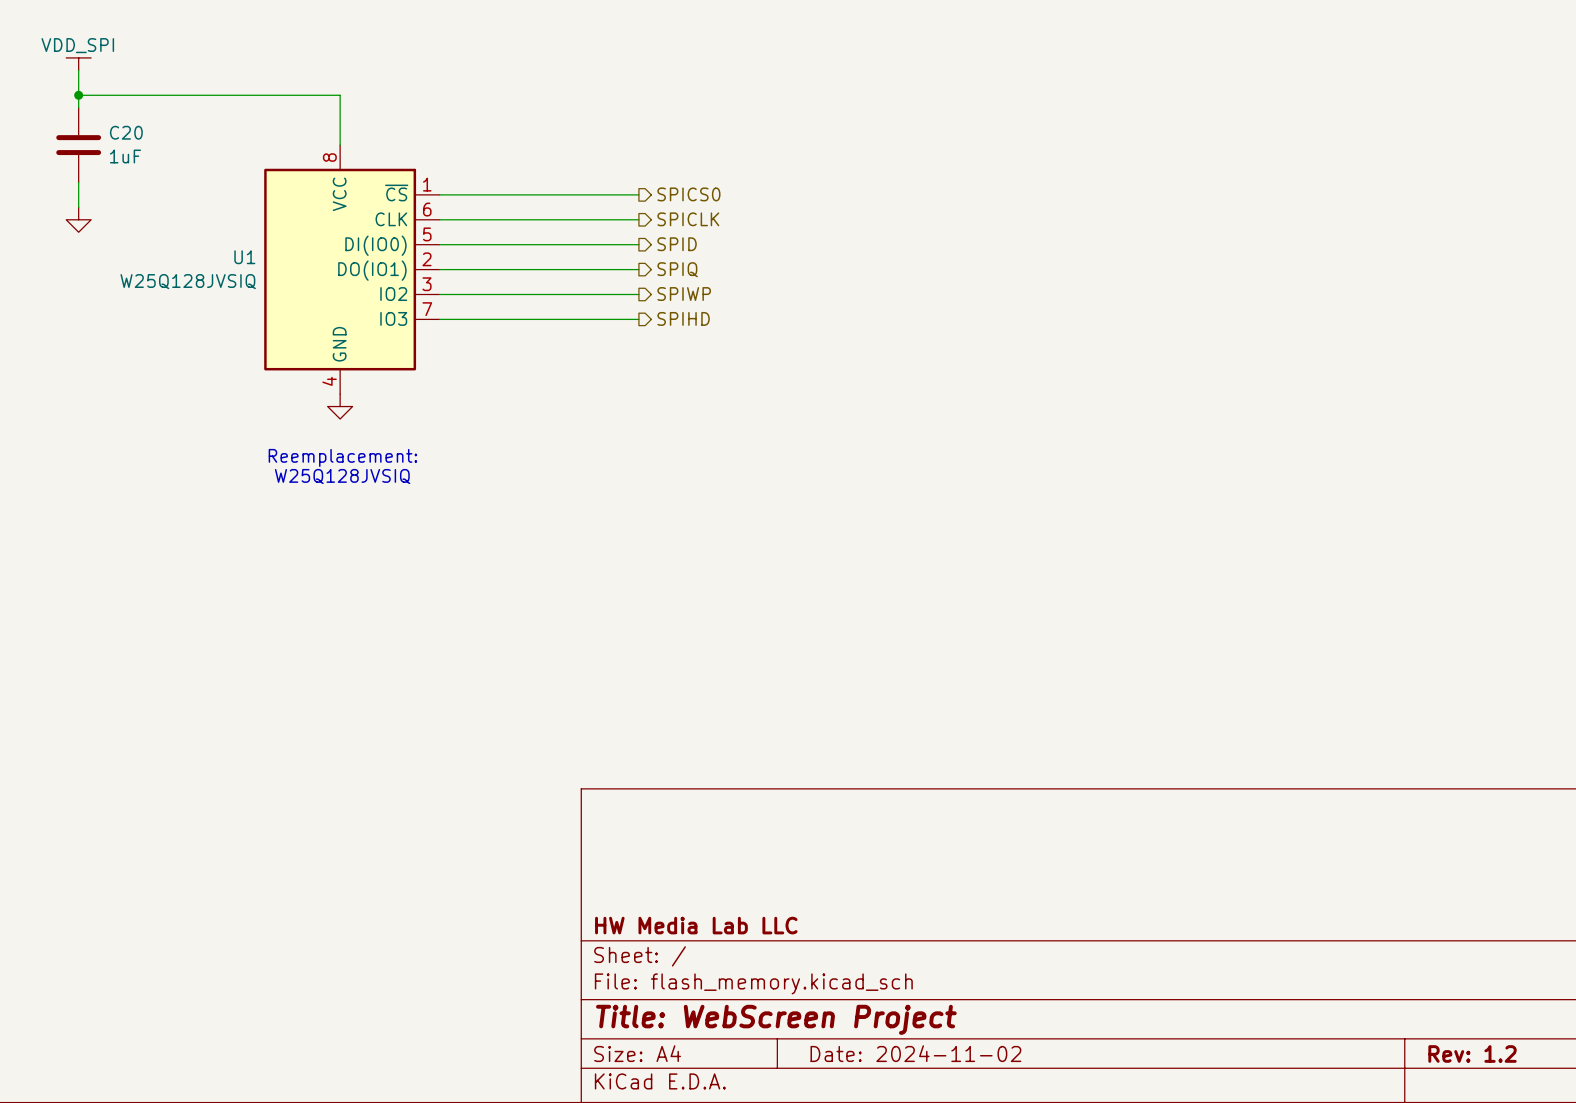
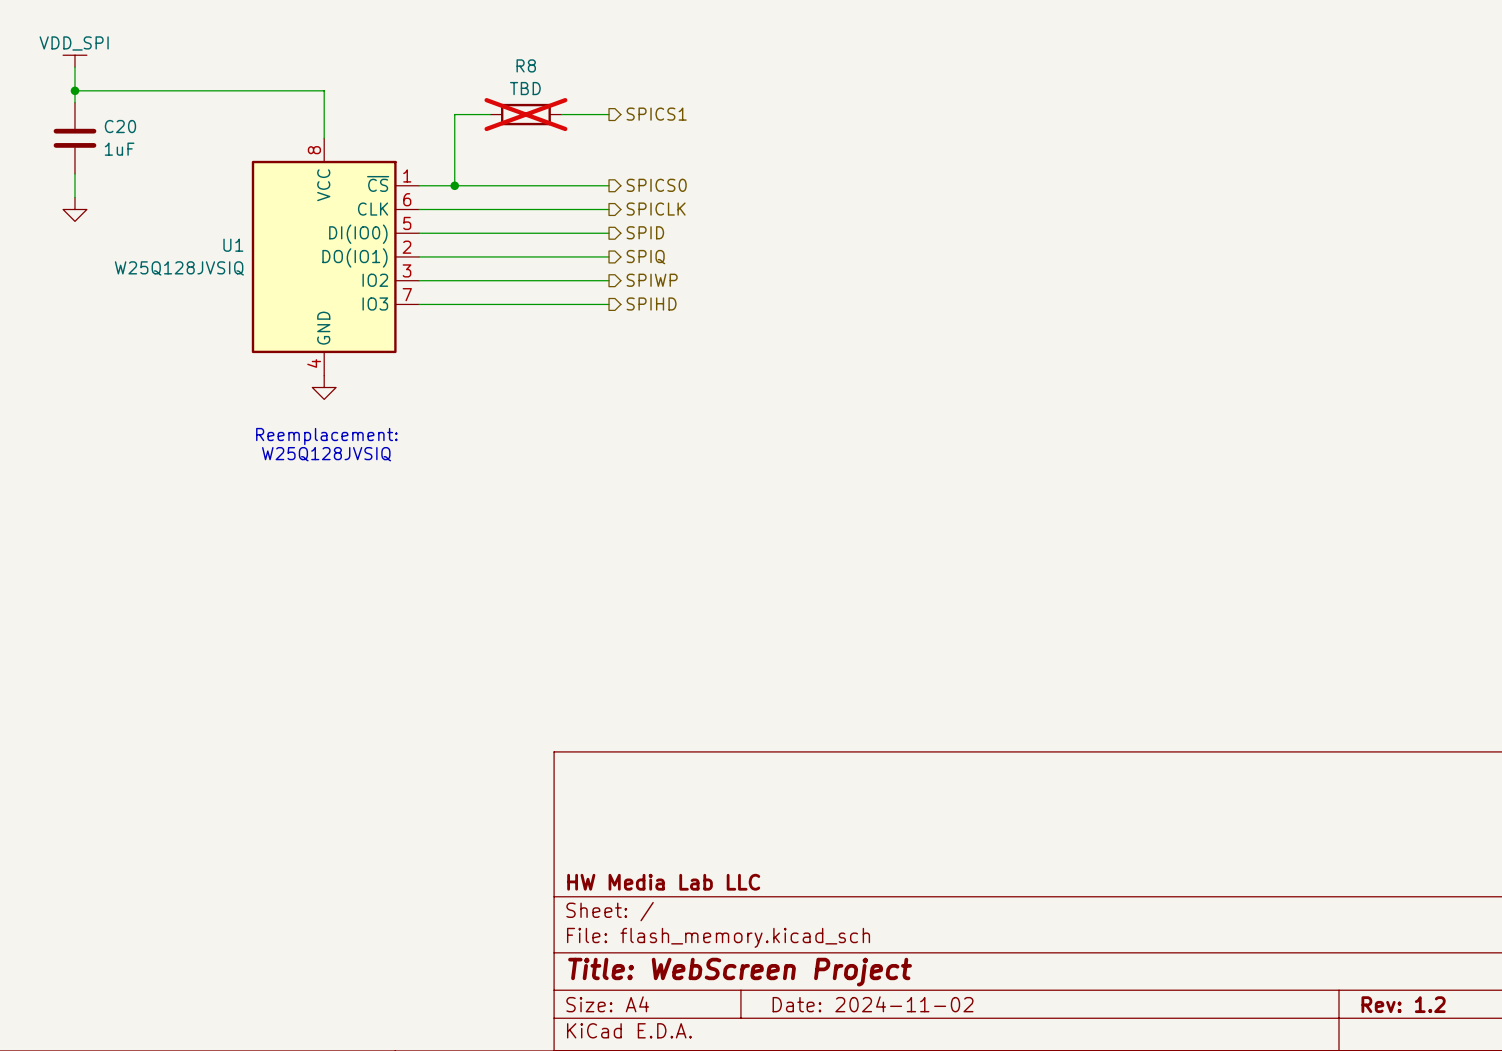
hierarchical label: none -> SPICS1 (656, 114)
wire: none -> (490, 114) (454, 114) (454, 185)
R8: none -> TBD (525, 114)
wire: none -> (561, 114) (609, 114)
junction: none -> (454, 185)

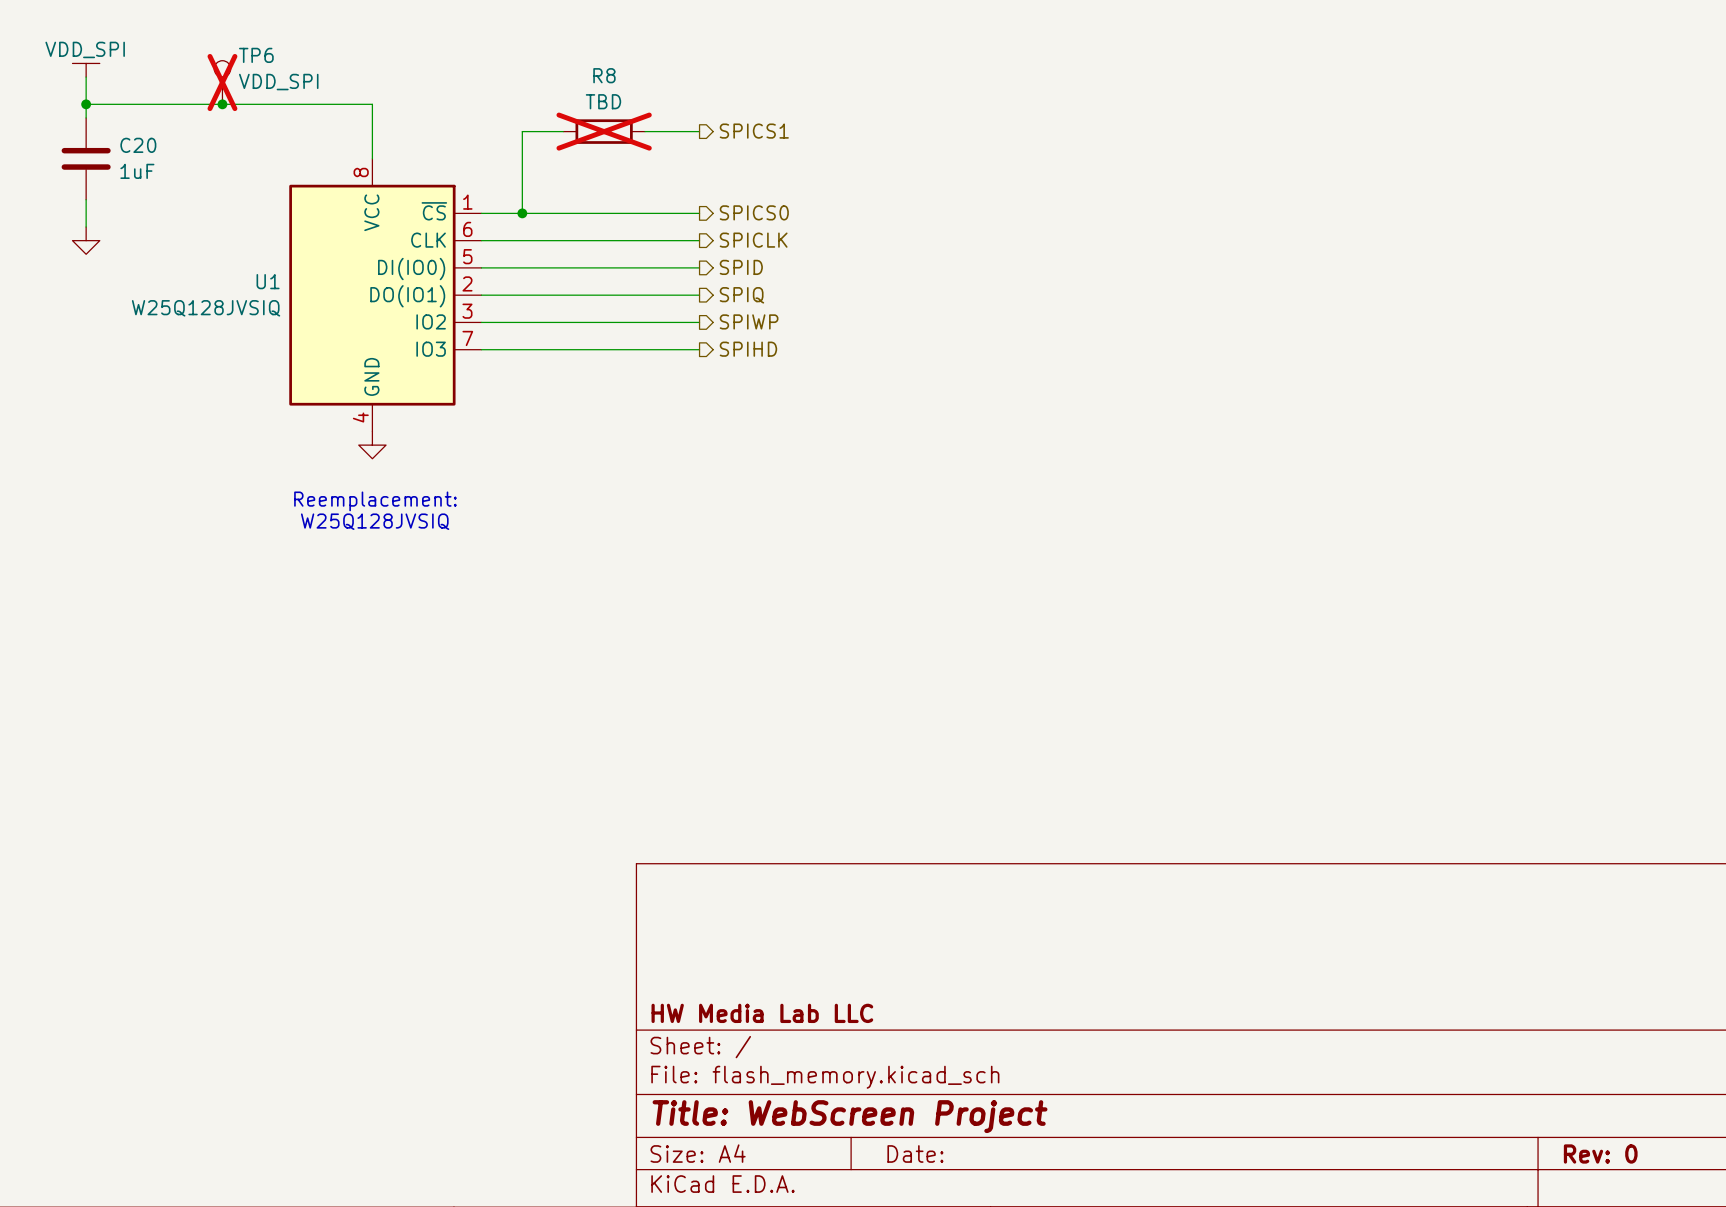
TP6: none -> VDD_SPI (222, 82)
junction: none -> (222, 104)
title block: Date: 2024-11-02 (873, 1004) -> Date: (915, 1153)
title block: Rev: 1.2 (1403, 1004) -> Rev: 0 (1600, 1153)

